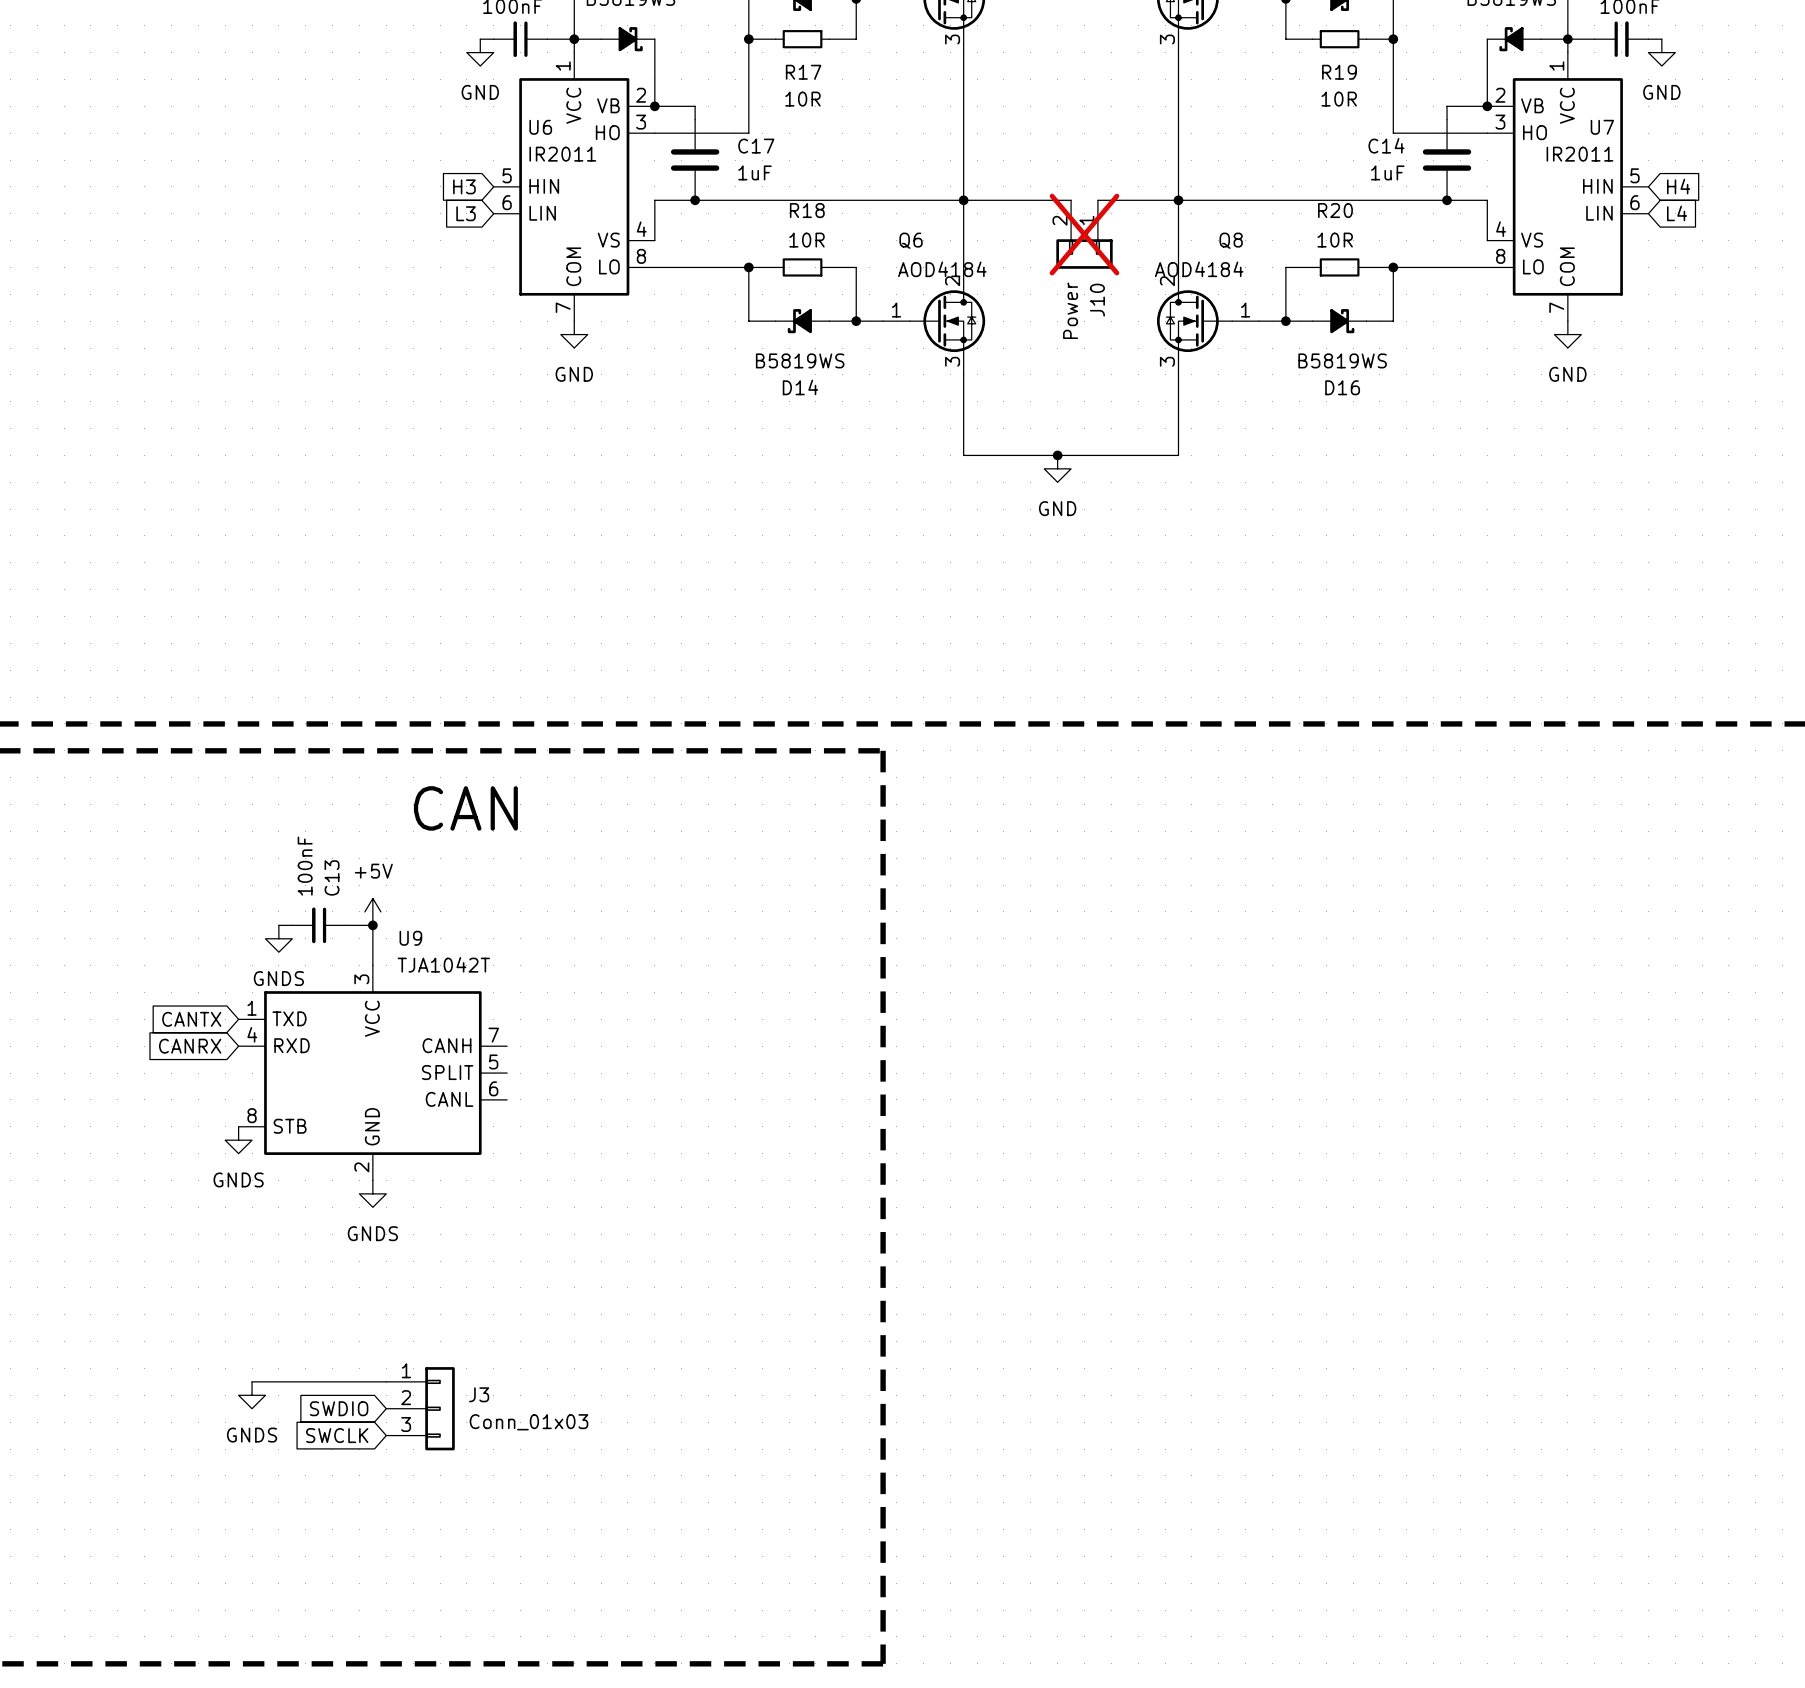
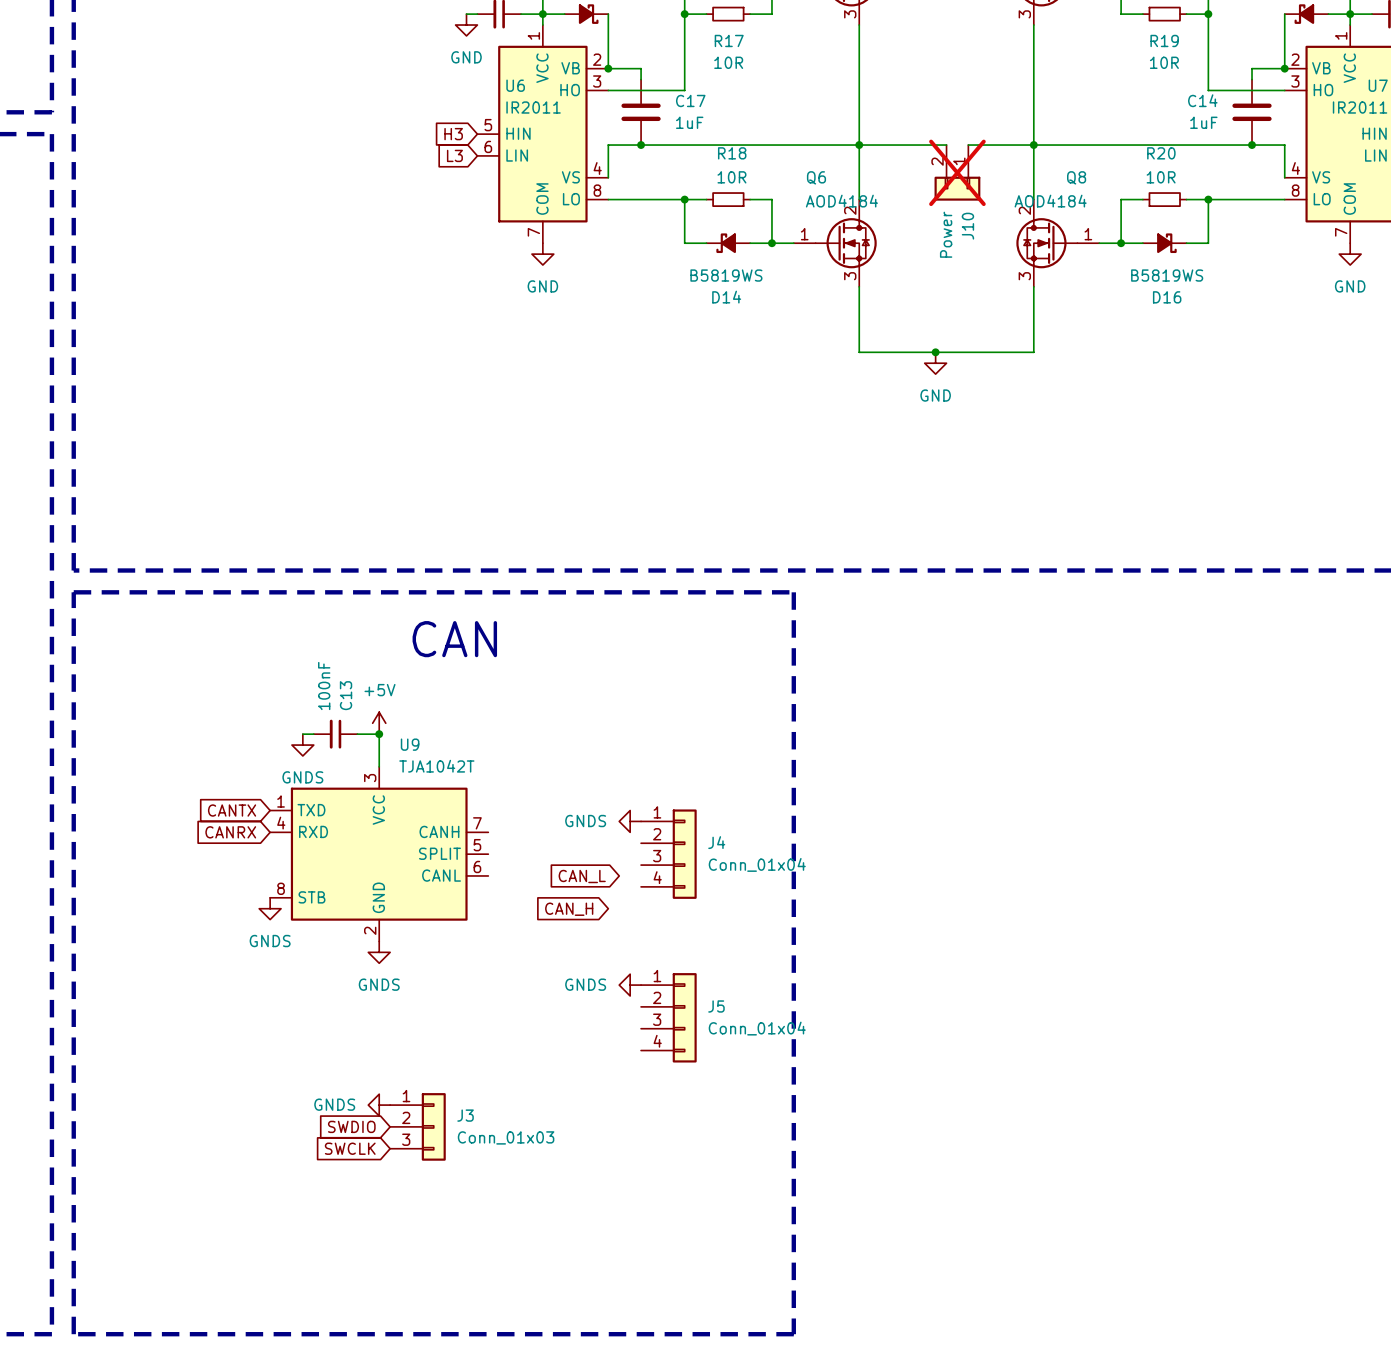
power symbol: none -> GNDS (630, 821)
J4: none -> Conn_01x04 (668, 854)
global label: none -> CAN_L (582, 876)
global label: none -> CAN_H (569, 909)
power symbol: none -> GNDS (630, 985)
J5: none -> Conn_01x04 (668, 1017)
wire: (252, 1381) (386, 1381) -> none
power symbol rotation: 0° (252, 1395) -> 90° clockwise (379, 1105)
power symbol position: GNDS (252, 1395) -> GNDS (379, 1105)

